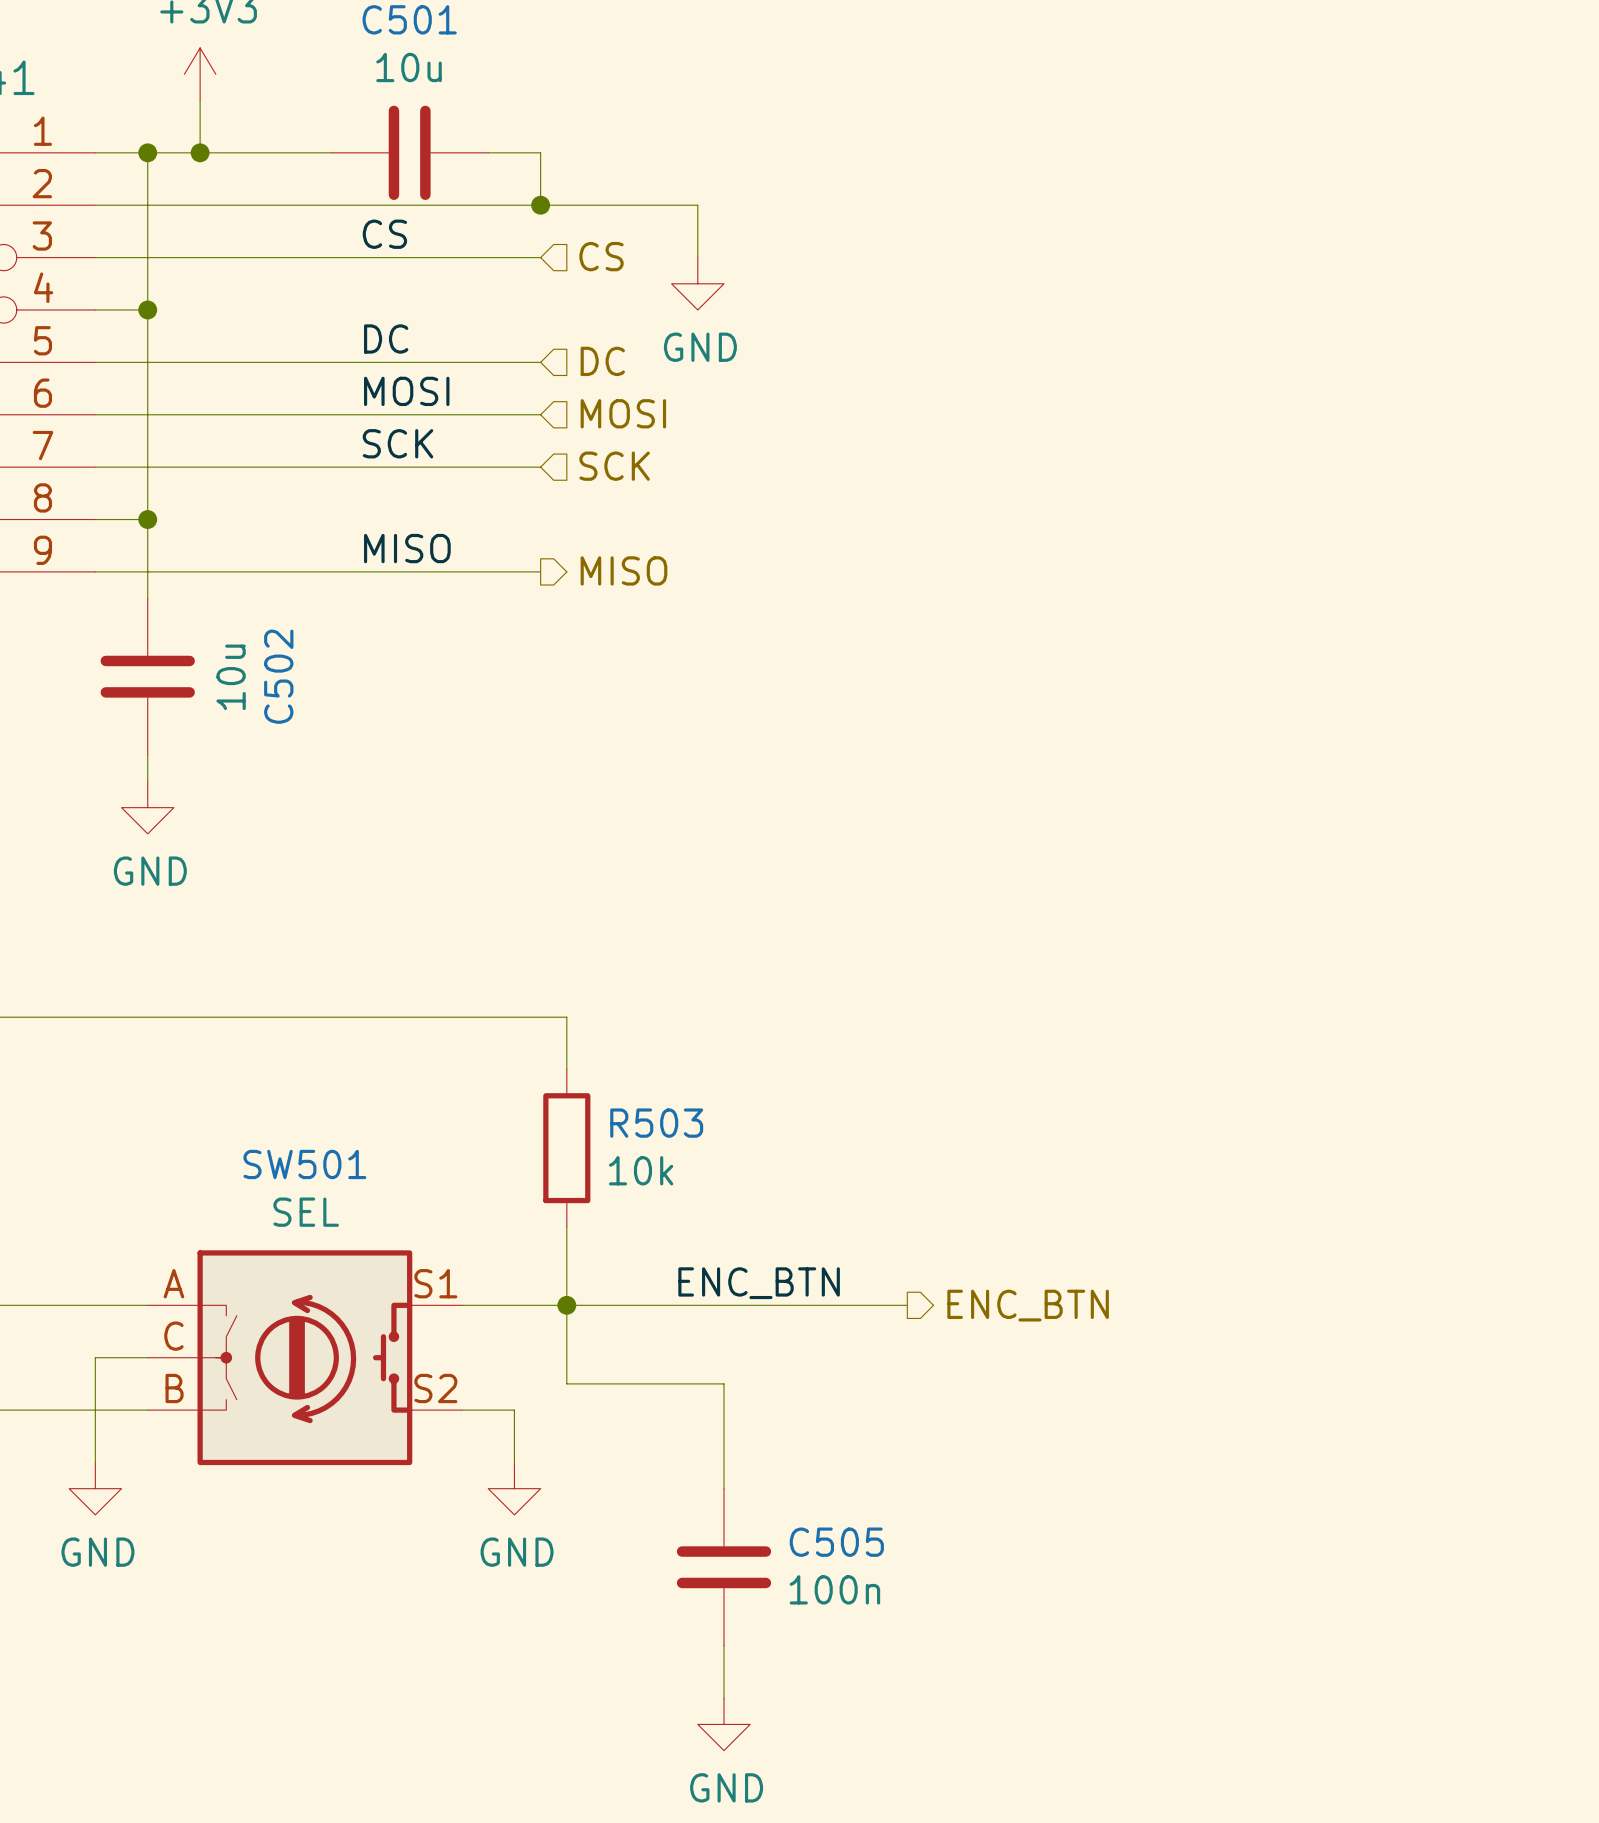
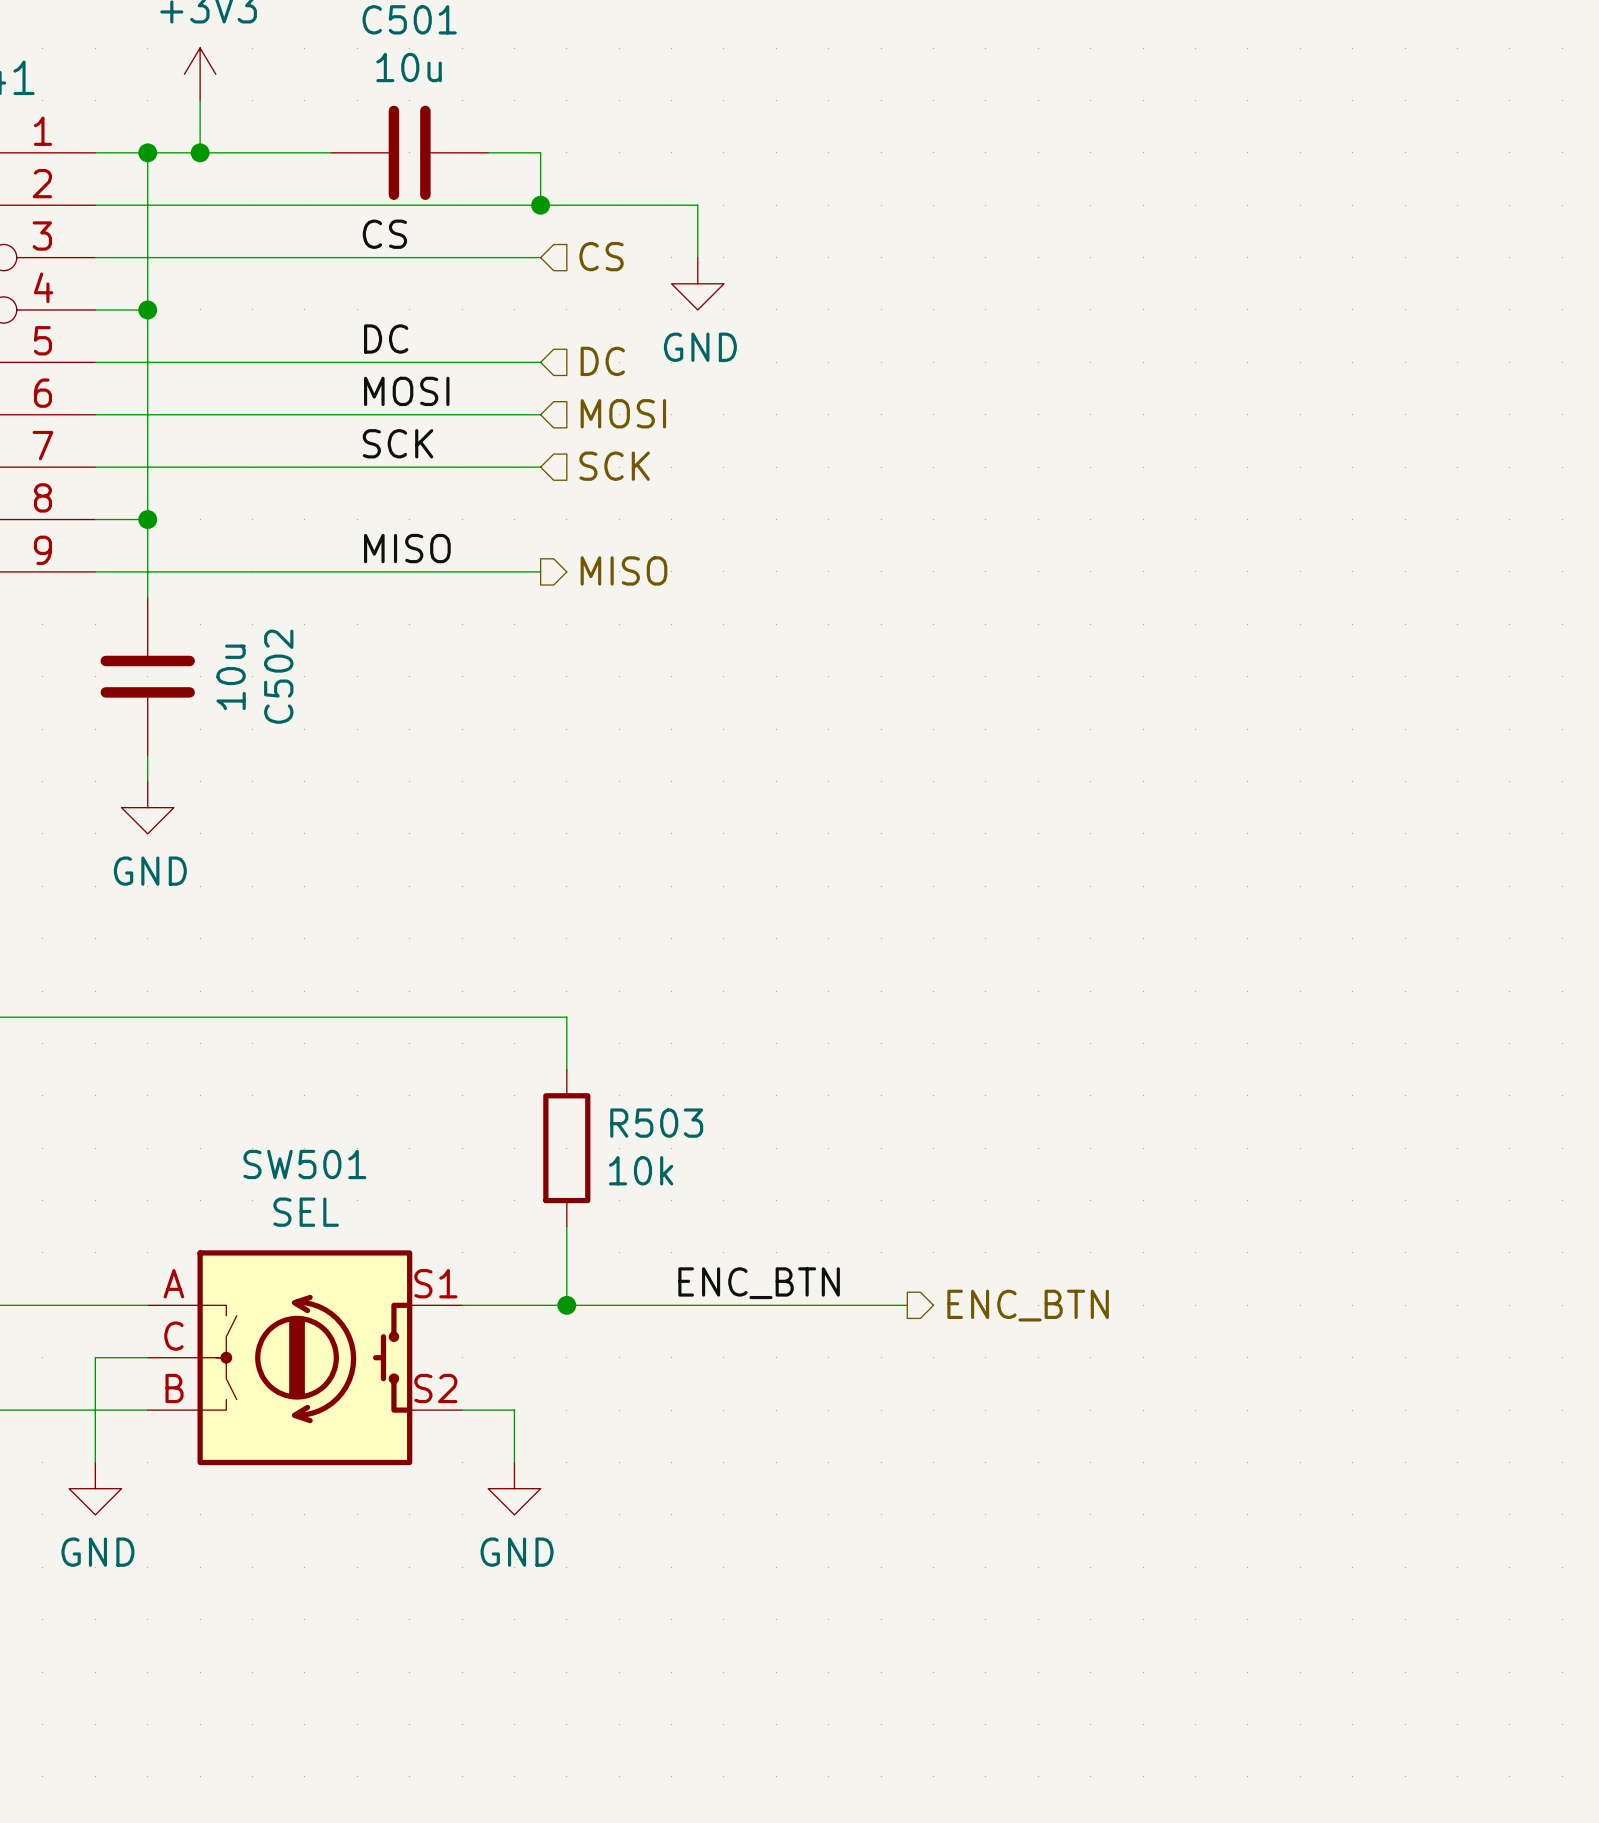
wire: (566, 1305) (566, 1383) (723, 1383) (723, 1488) -> none
C505: 100n (723, 1567) -> none
wire: (723, 1645) (723, 1698) -> none
power symbol: GND (723, 1724) -> none

